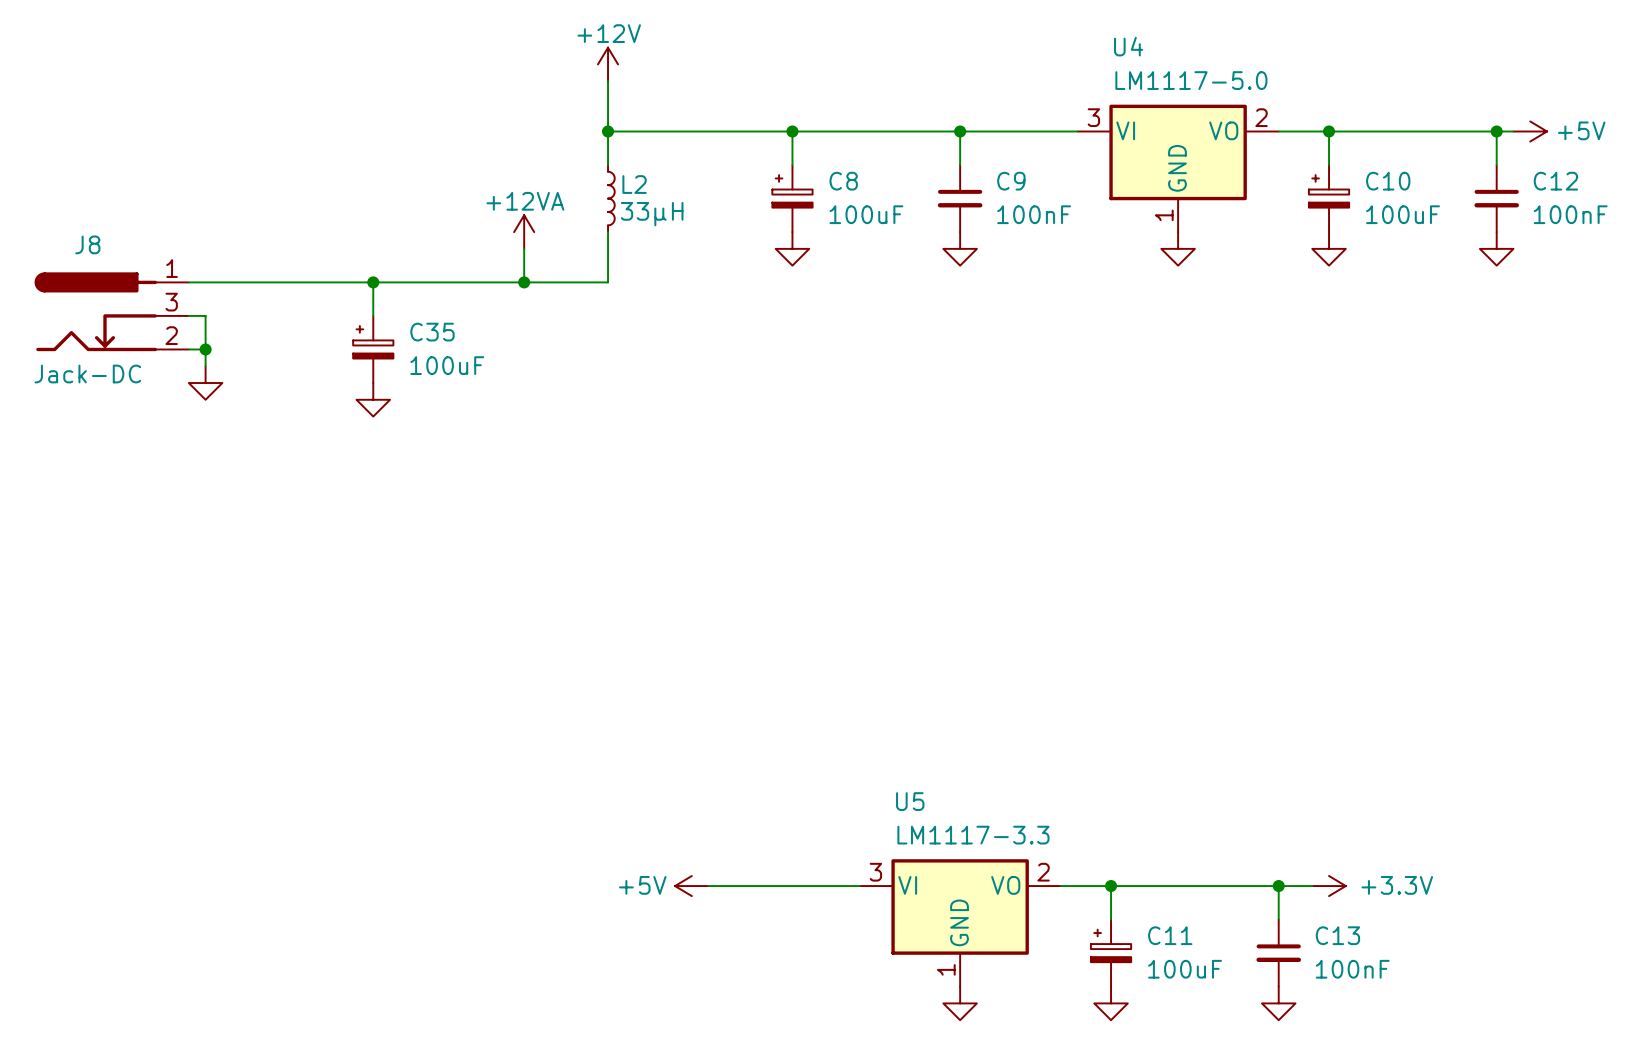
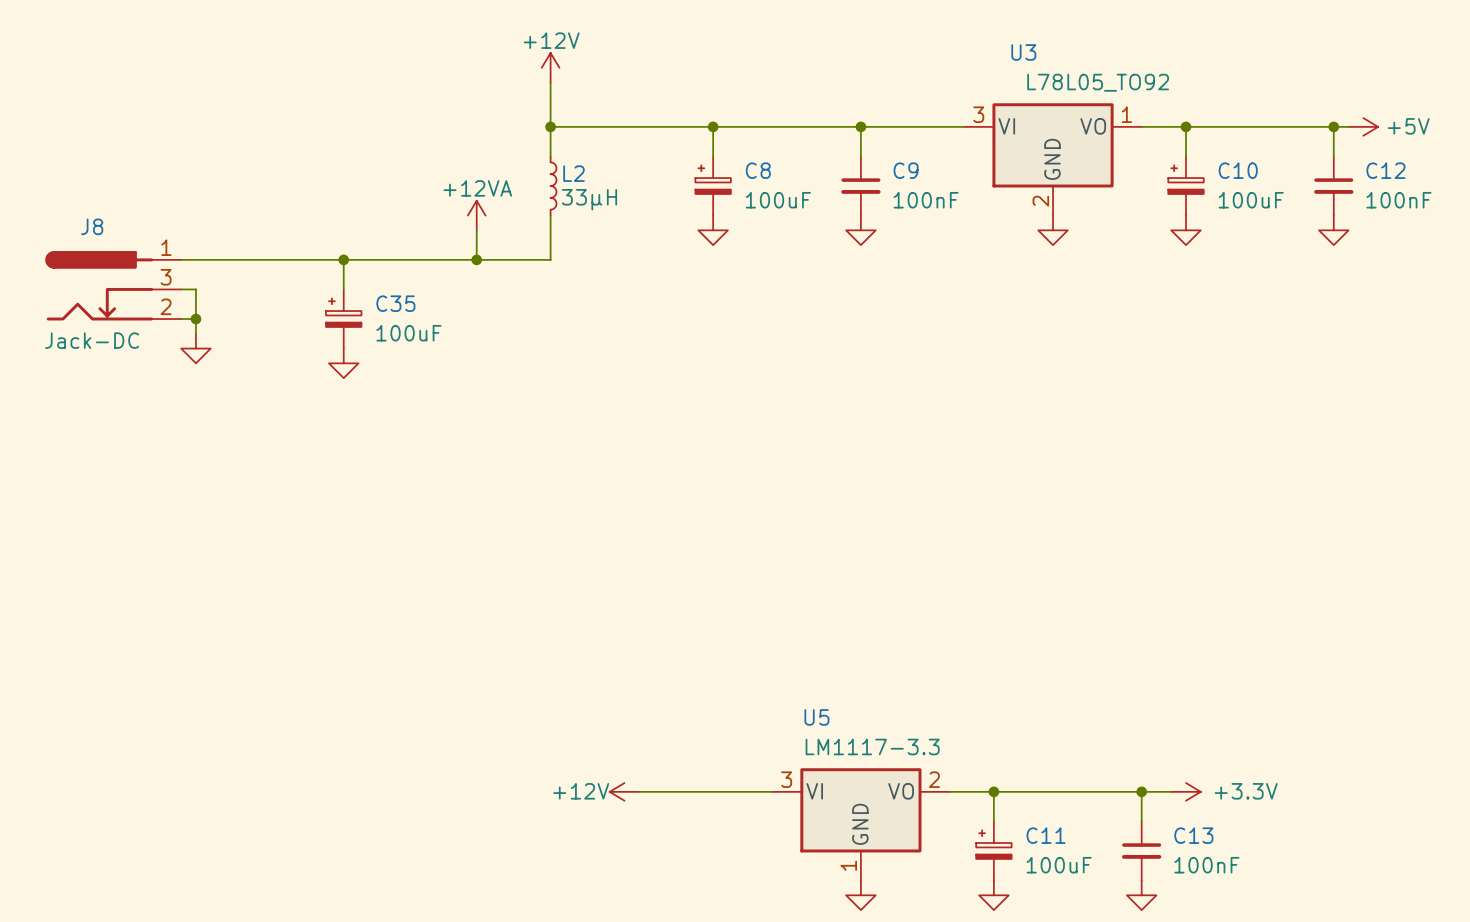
U4 name: U4 (1128, 46) -> U3 (1023, 52)
U4 value: LM1117-5.0 (1191, 80) -> L78L05_TO92 (1098, 82)
U4 pin number: 2 (1261, 117) -> 1 (1126, 114)
U4 pin number: 1 (1164, 215) -> 2 (1040, 201)
power symbol: +5V (691, 886) -> +12V (624, 791)

